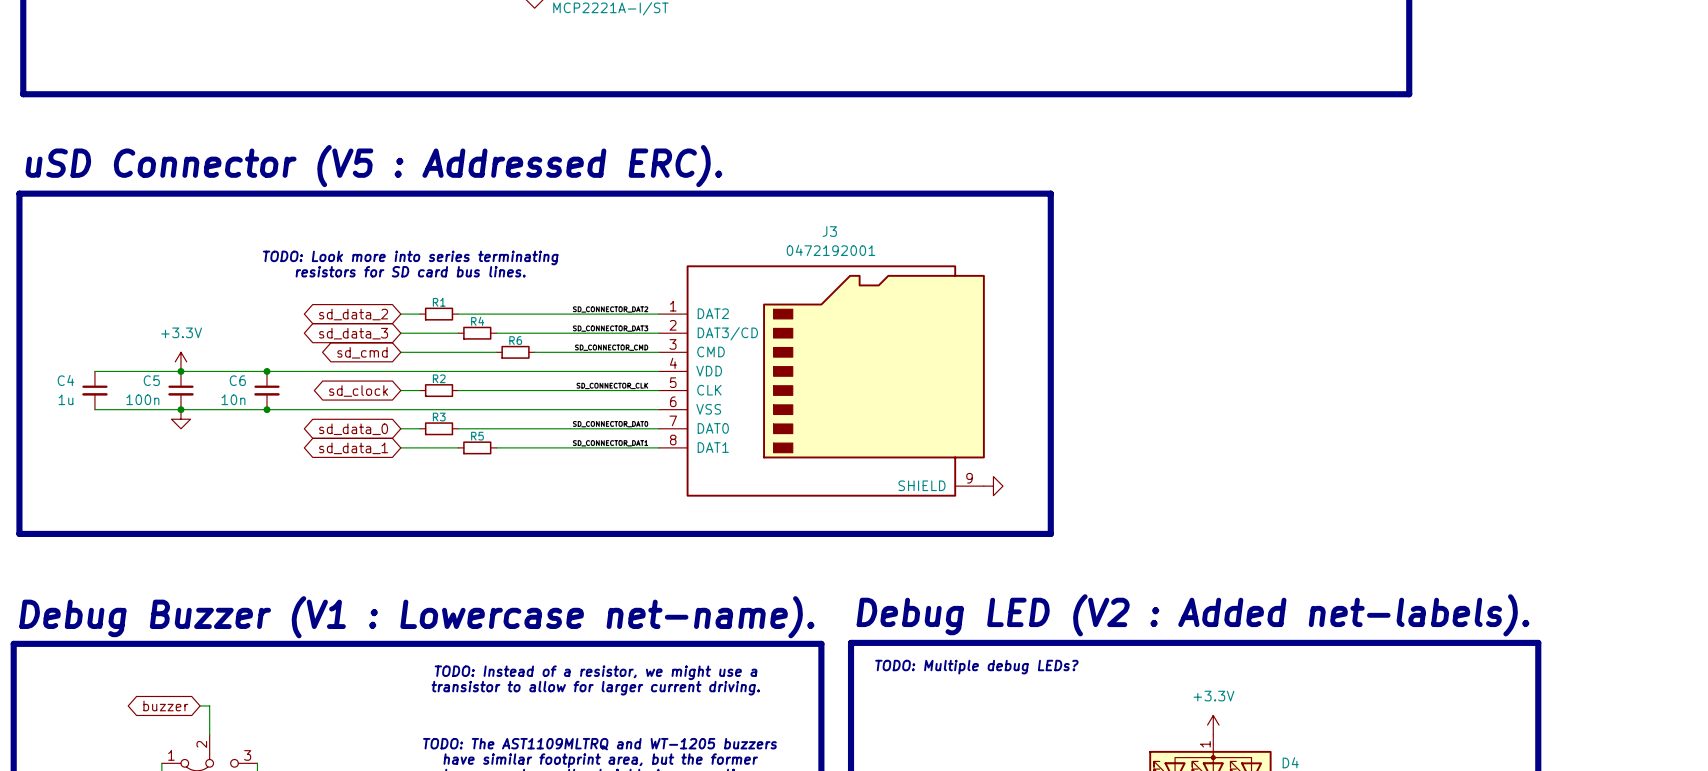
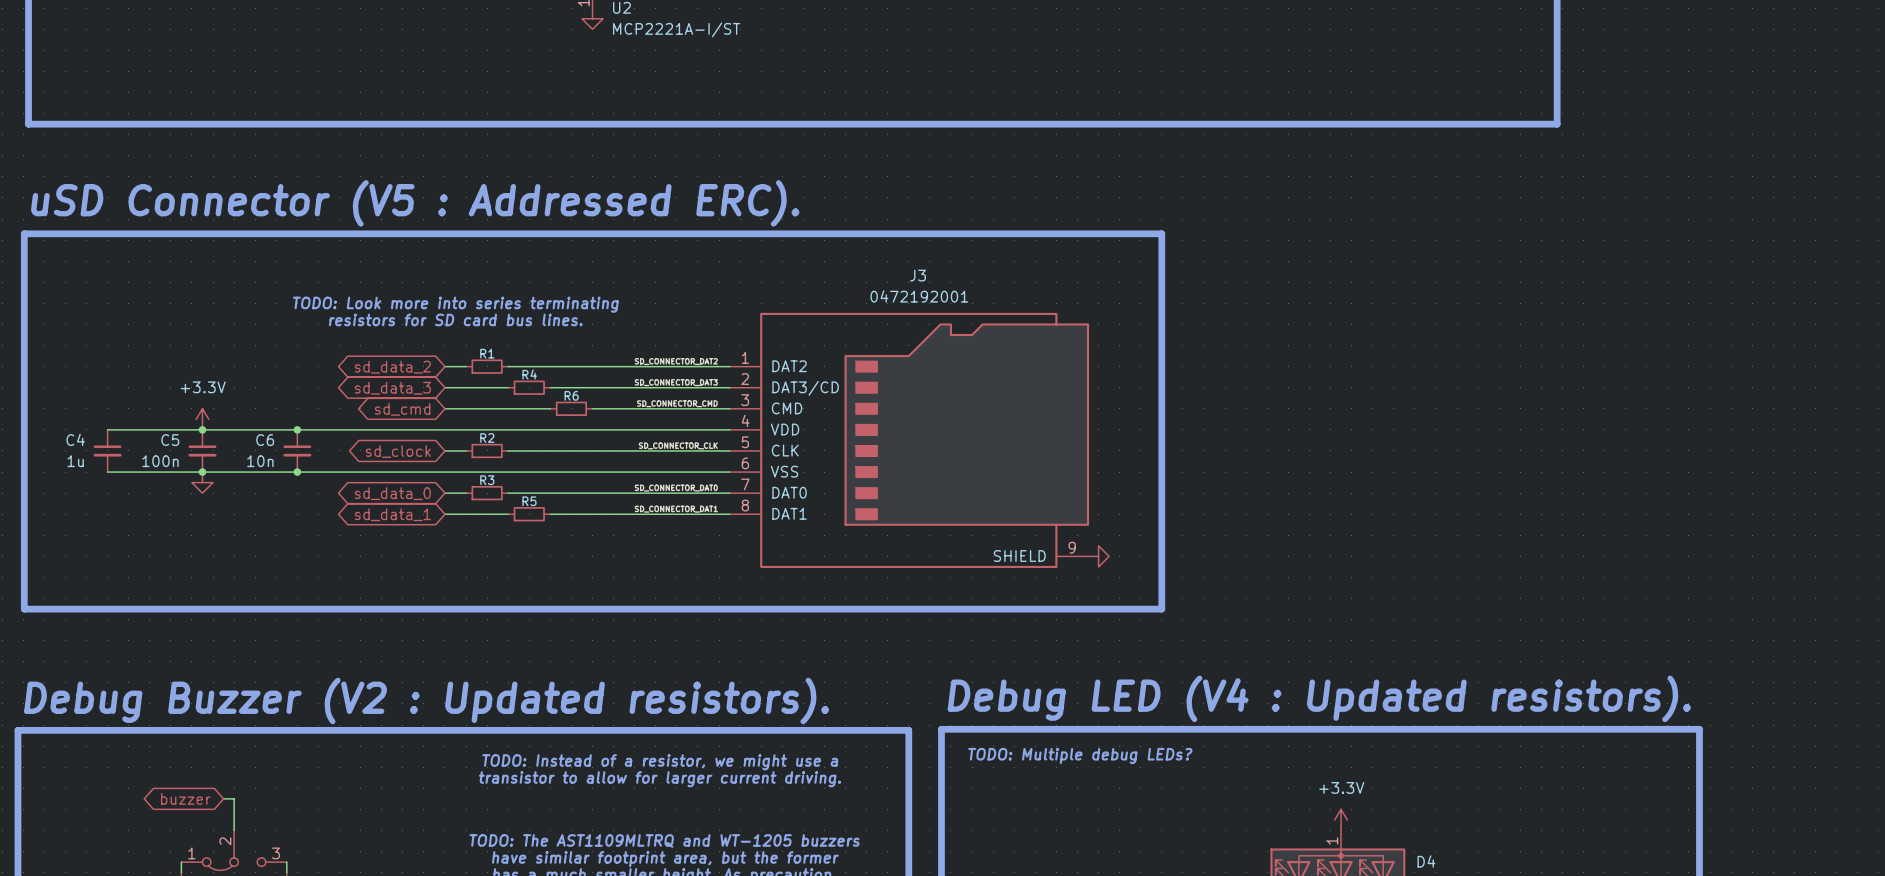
text: Debug LED (V2 : Added net-labels). (1193, 615) -> Debug LED (V4 : Updated resistors). (1319, 698)
text: Debug Buzzer (V1 : Lowercase net-name). (416, 617) -> Debug Buzzer (V2 : Updated resistors). (426, 700)

